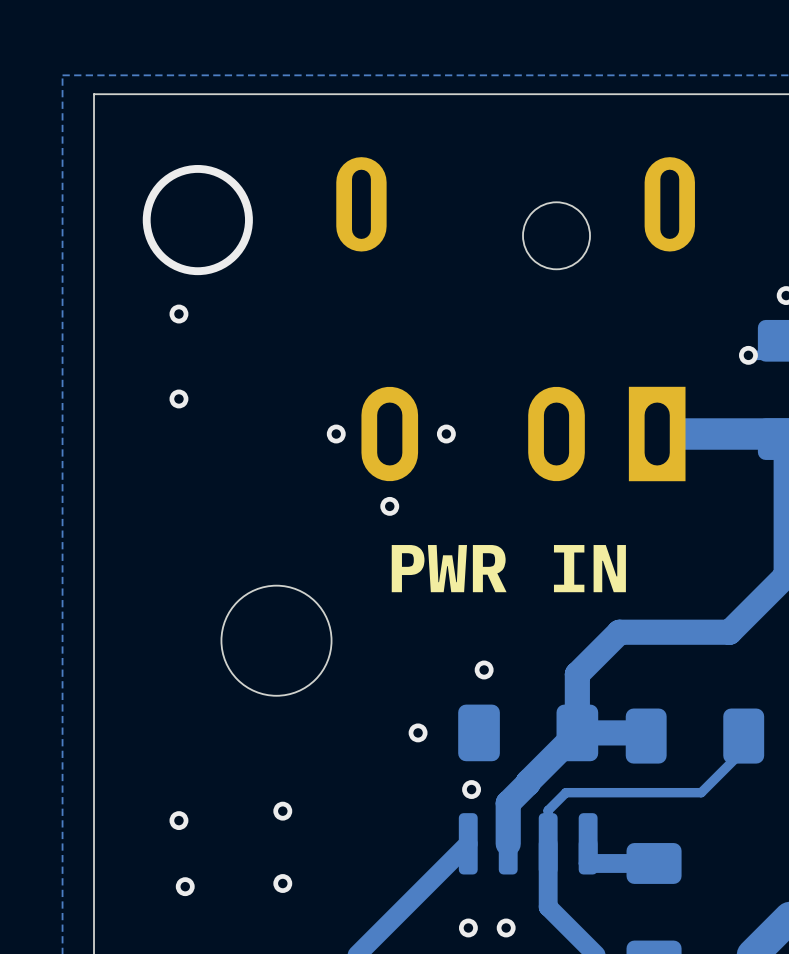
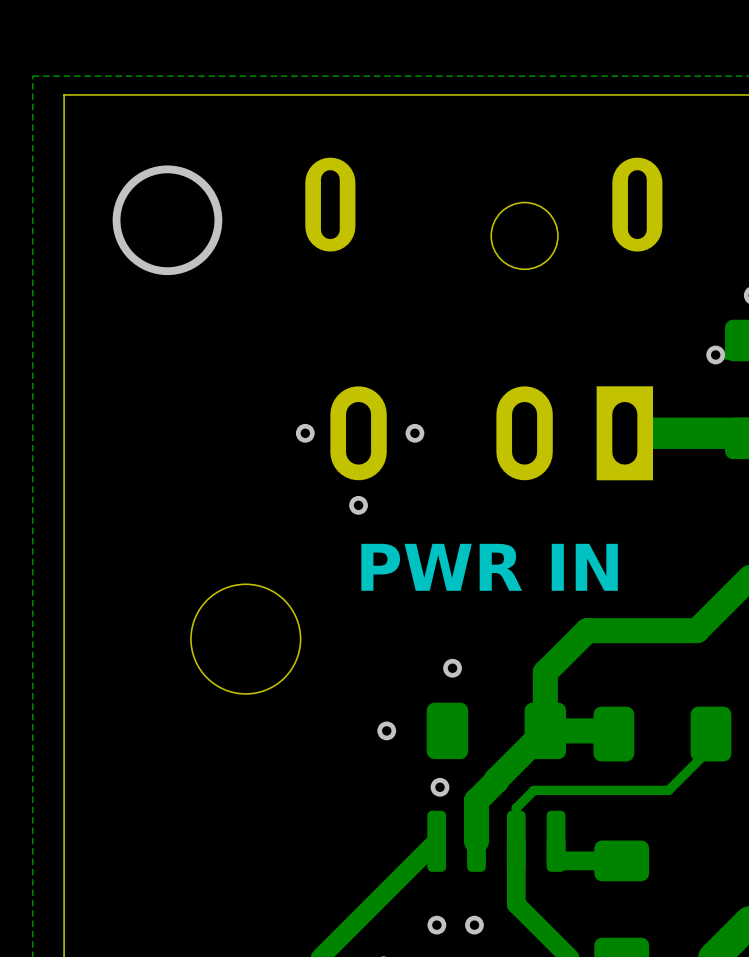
via: (178, 314) -> none
via: (178, 398) -> none
via: (282, 811) -> none
via: (178, 820) -> none
via: (282, 883) -> none
via: (185, 886) -> none

